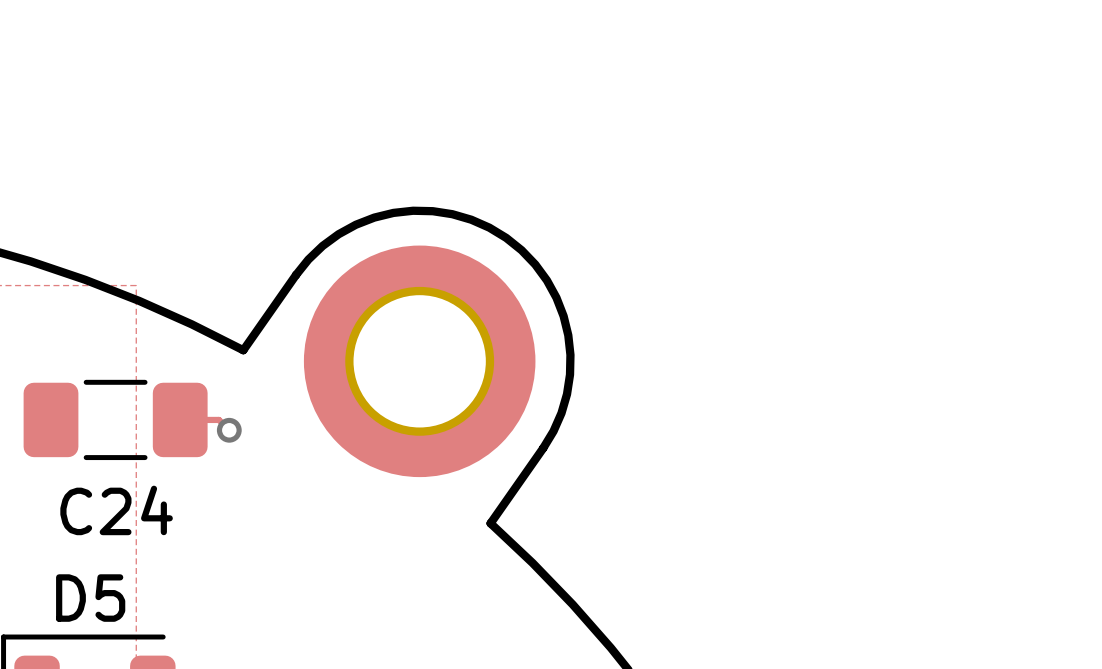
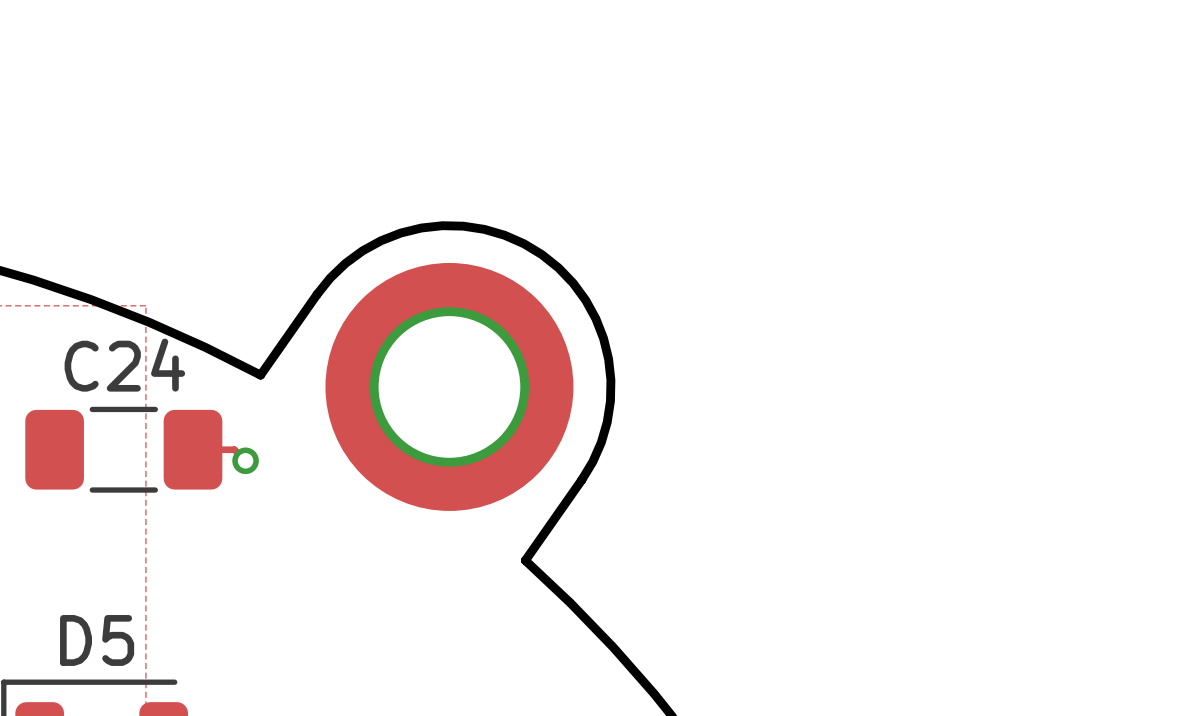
C24 name position: C24 (116, 510) -> C24 (124, 365)

